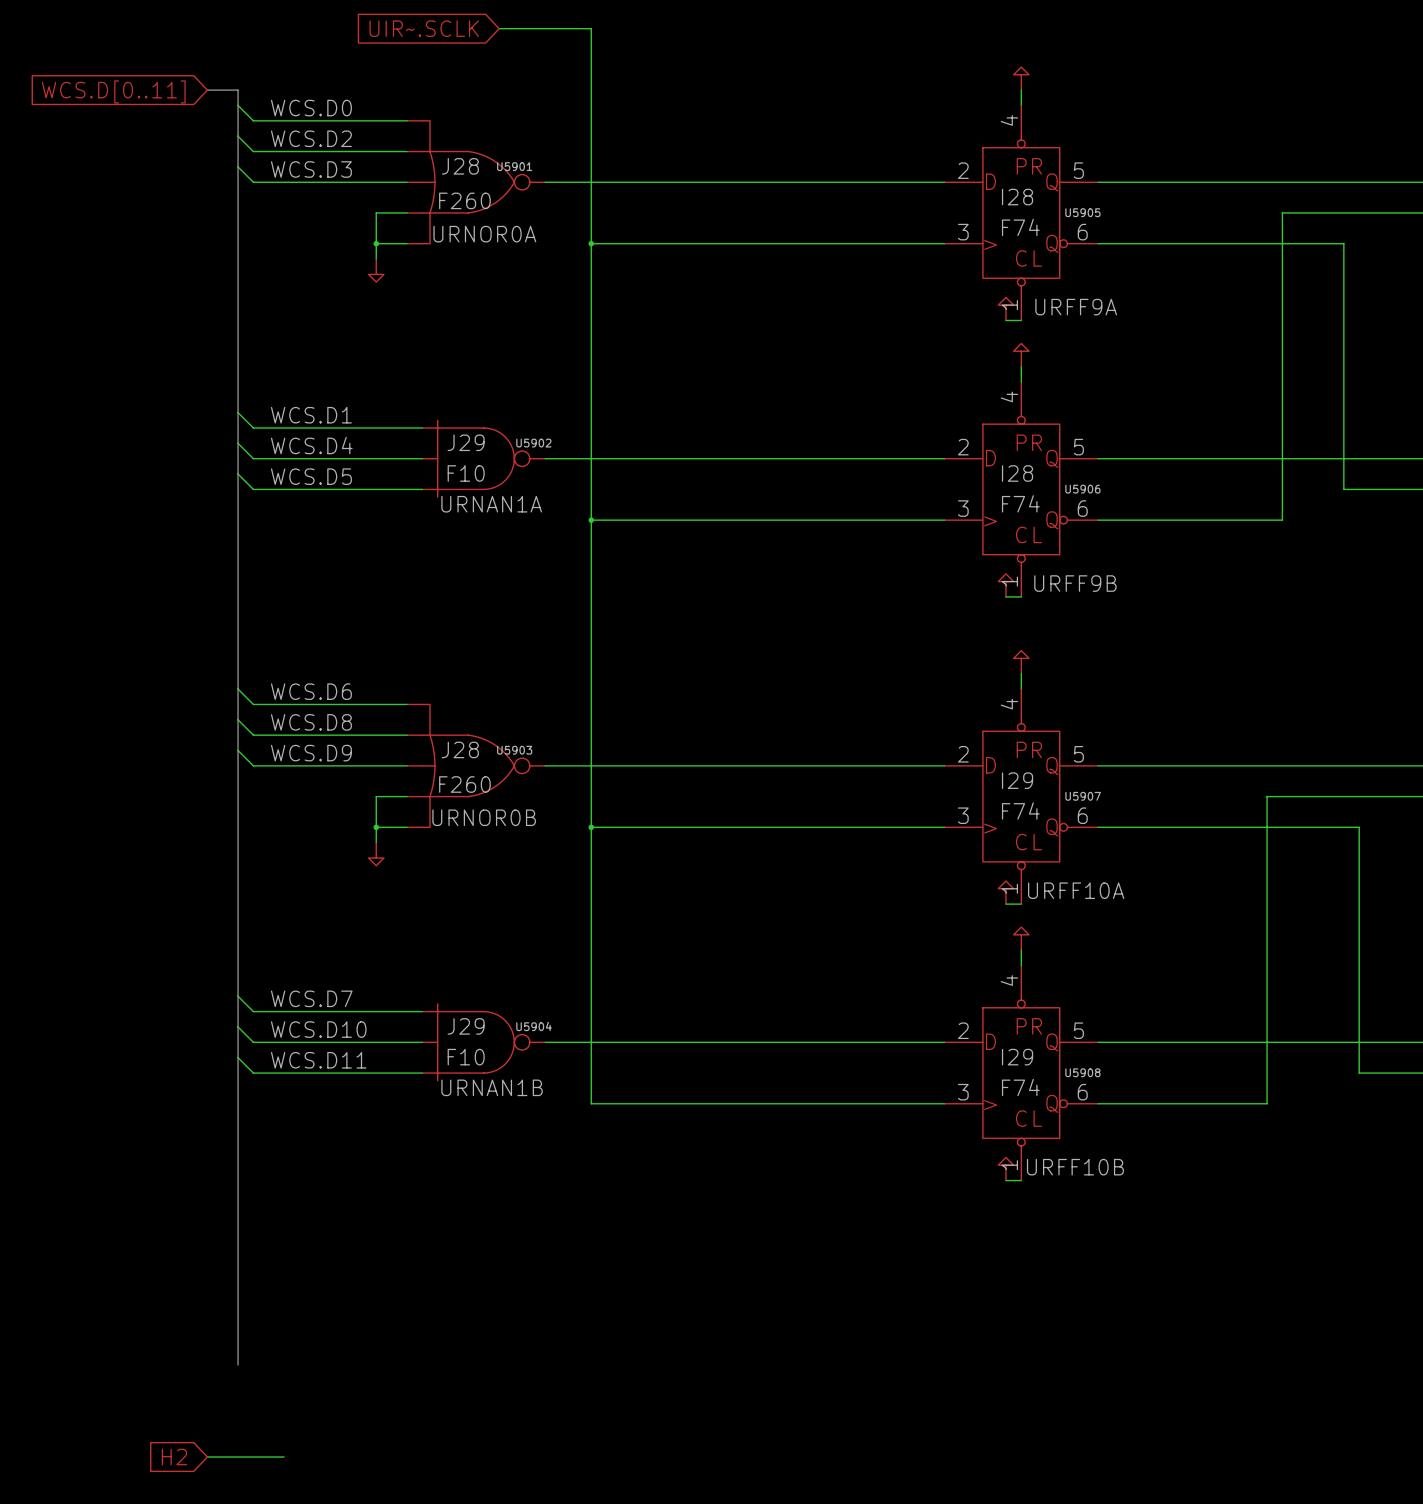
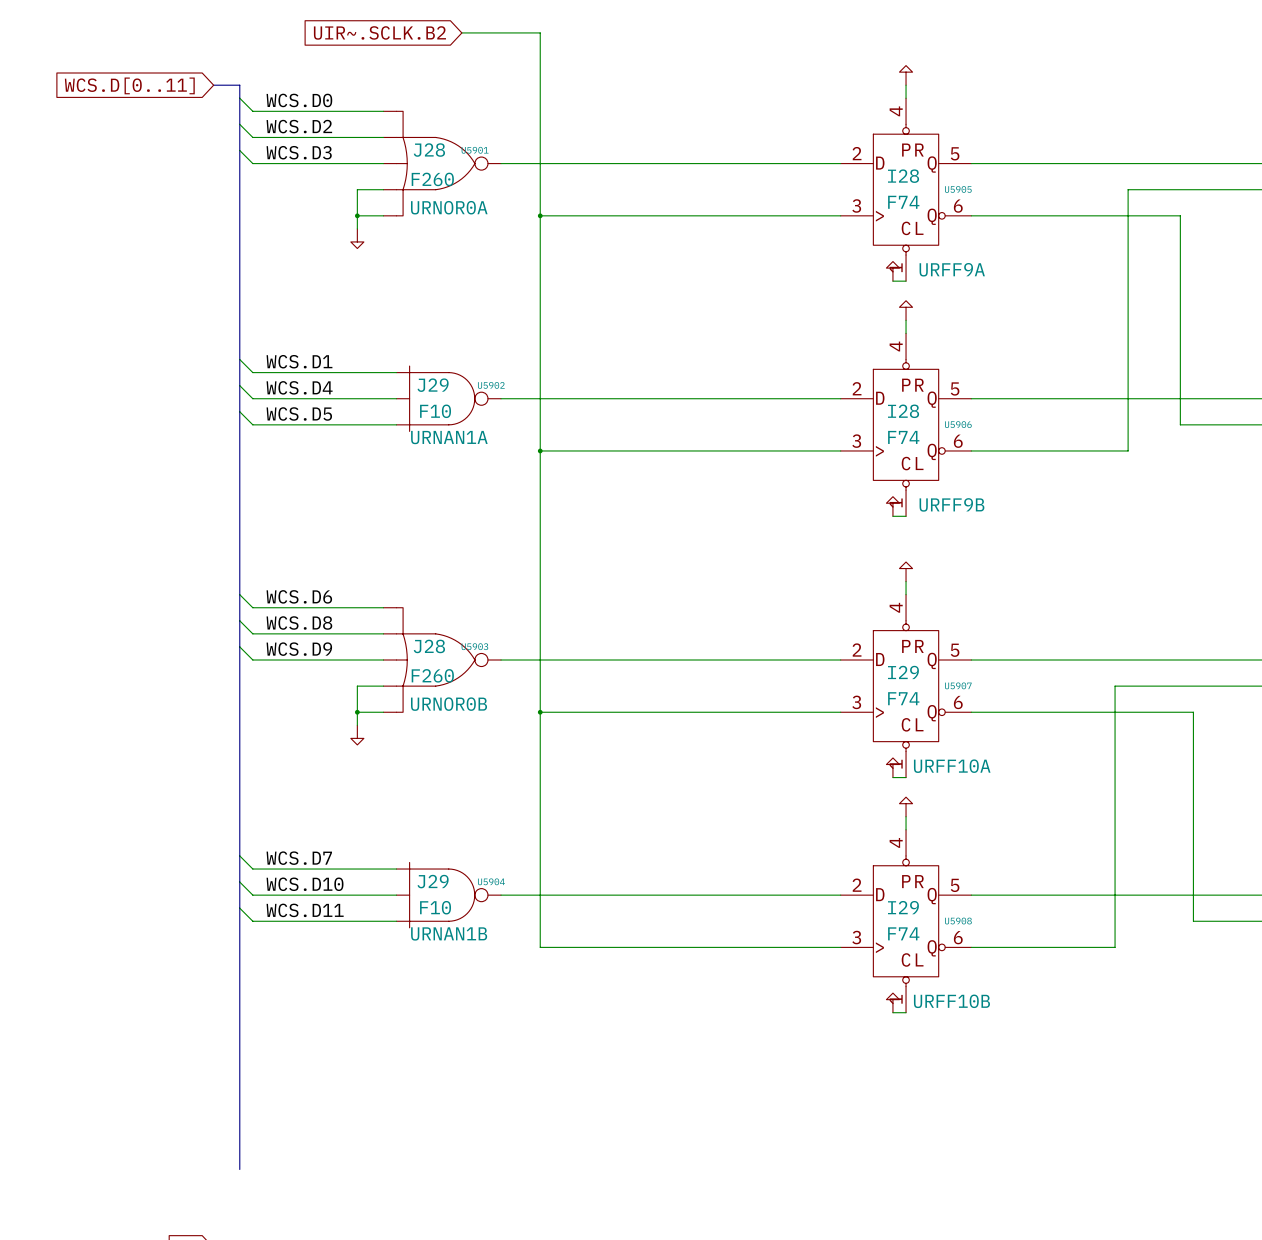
global label: UIR~.SCLK (424, 28) -> UIR~.SCLK.B2 (379, 32)

